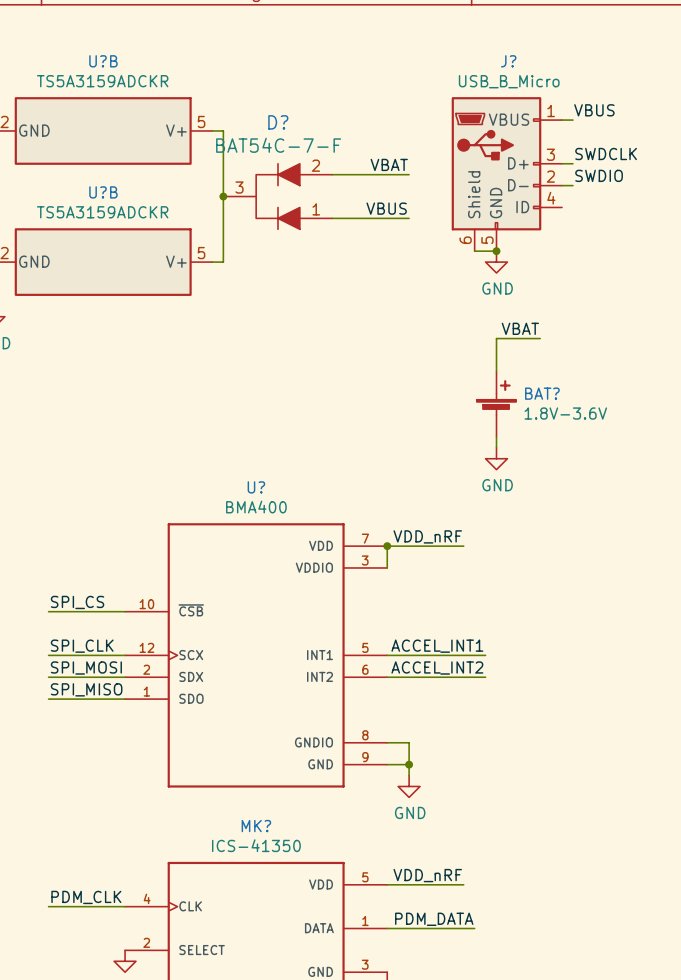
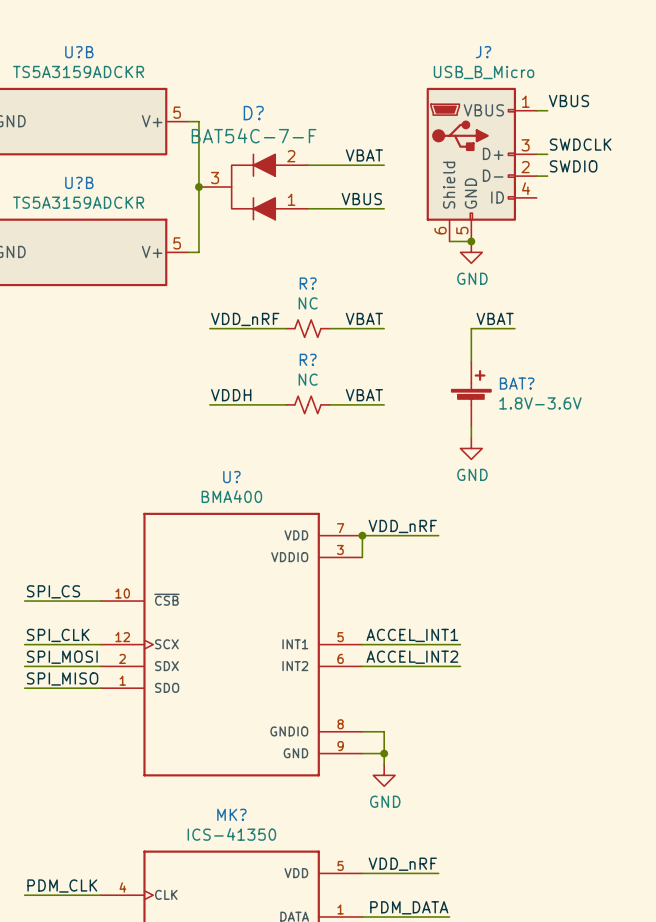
label: none -> VBAT (364, 318)
label: none -> VDD_nRF (245, 319)
wire: none -> (209, 328) (286, 328)
R?: none -> NC (307, 328)
wire: none -> (329, 328) (384, 328)
label: none -> VDDH (231, 395)
label: none -> VBAT (364, 395)
wire: none -> (209, 404) (286, 404)
R?: none -> NC (307, 404)
wire: none -> (329, 404) (384, 404)

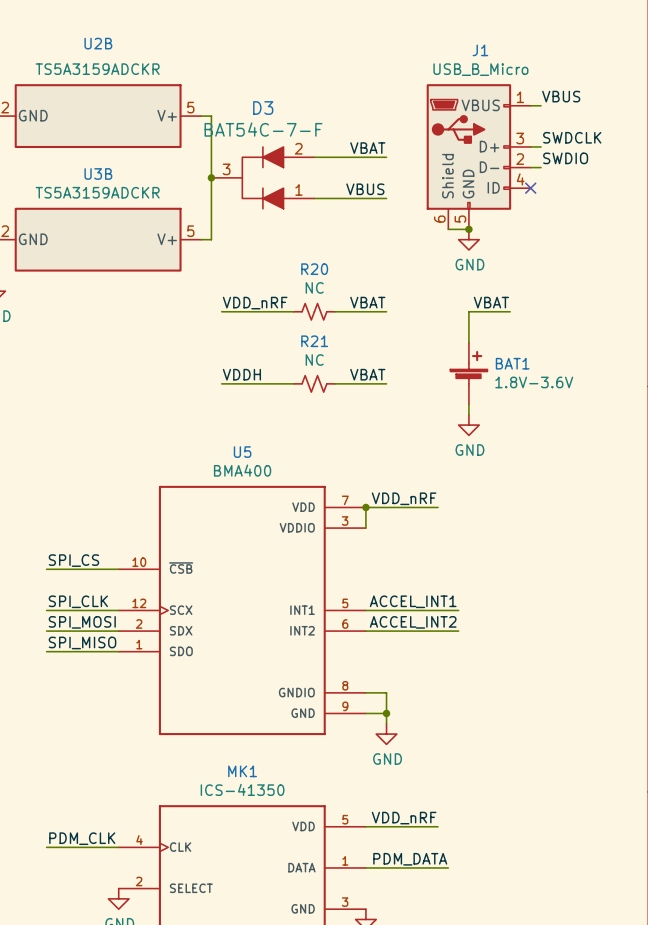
U?B name: U?B (79, 52) -> U2B (98, 43)
J? name: J? (483, 52) -> J1 (480, 50)
D? name: D? (253, 113) -> D3 (263, 107)
U?B name: U?B (79, 182) -> U3B (98, 173)
no-connect mark: none -> (530, 188)
R? name: R? (308, 283) -> R20 (314, 269)
R? name: R? (308, 359) -> R21 (314, 341)
BAT? name: BAT? (517, 383) -> BAT1 (512, 363)
U? name: U? (231, 477) -> U5 (242, 452)
MK? name: MK? (231, 814) -> MK1 (242, 771)

